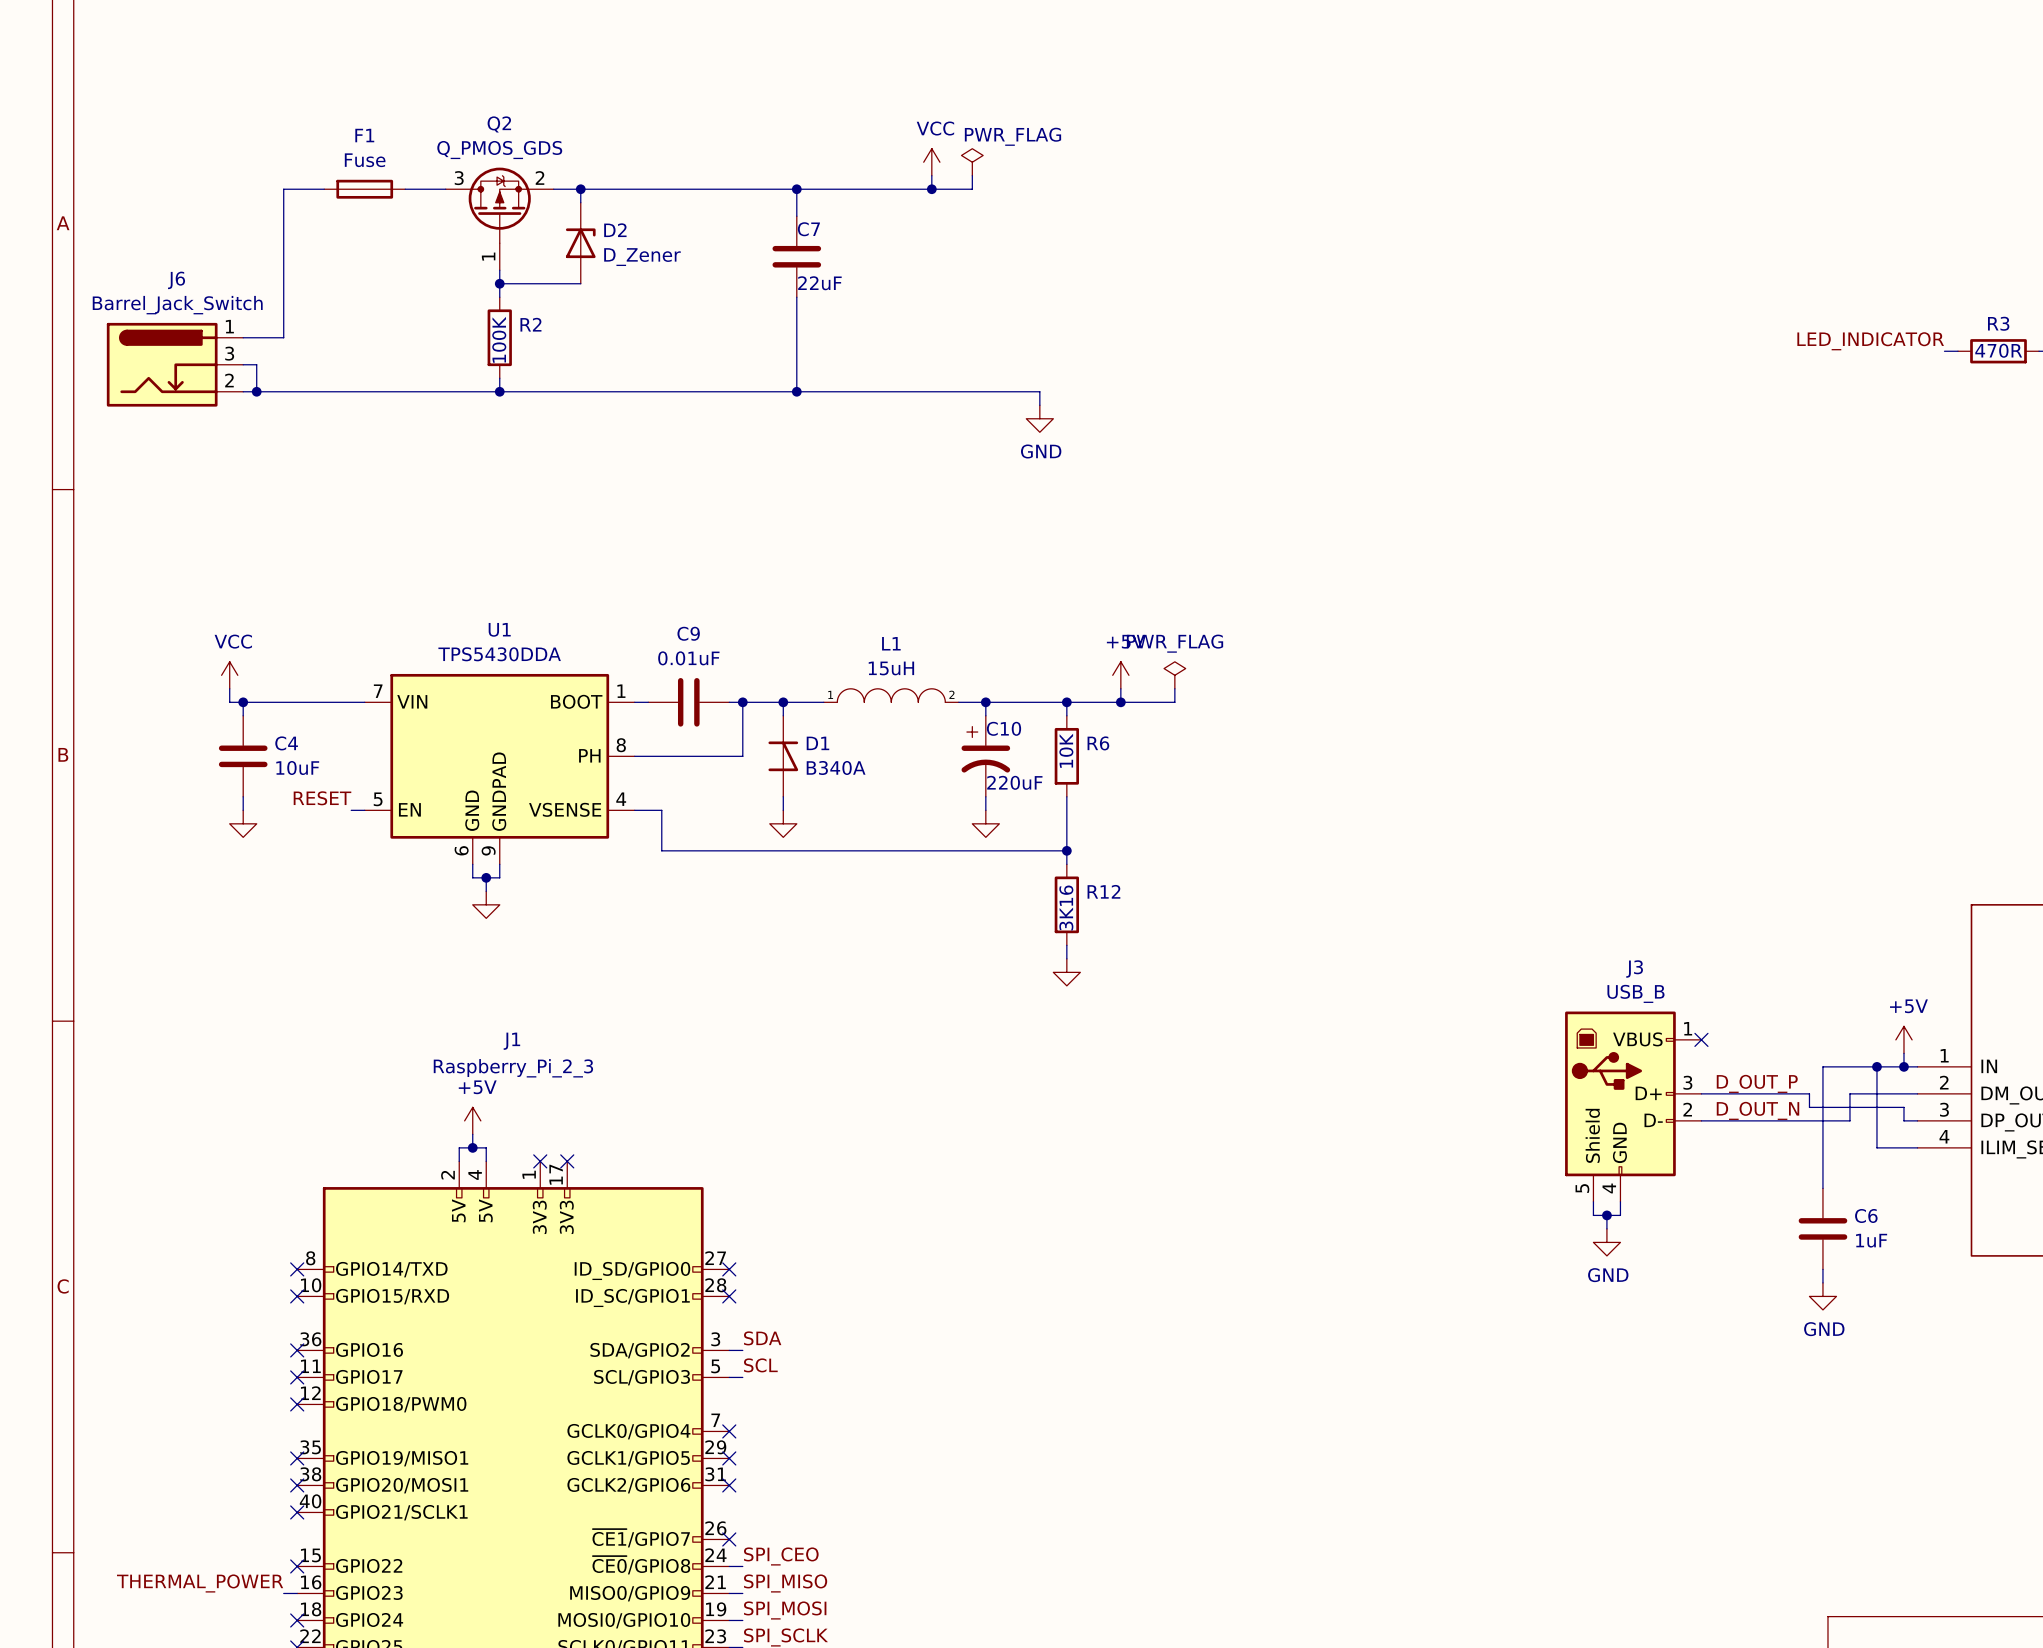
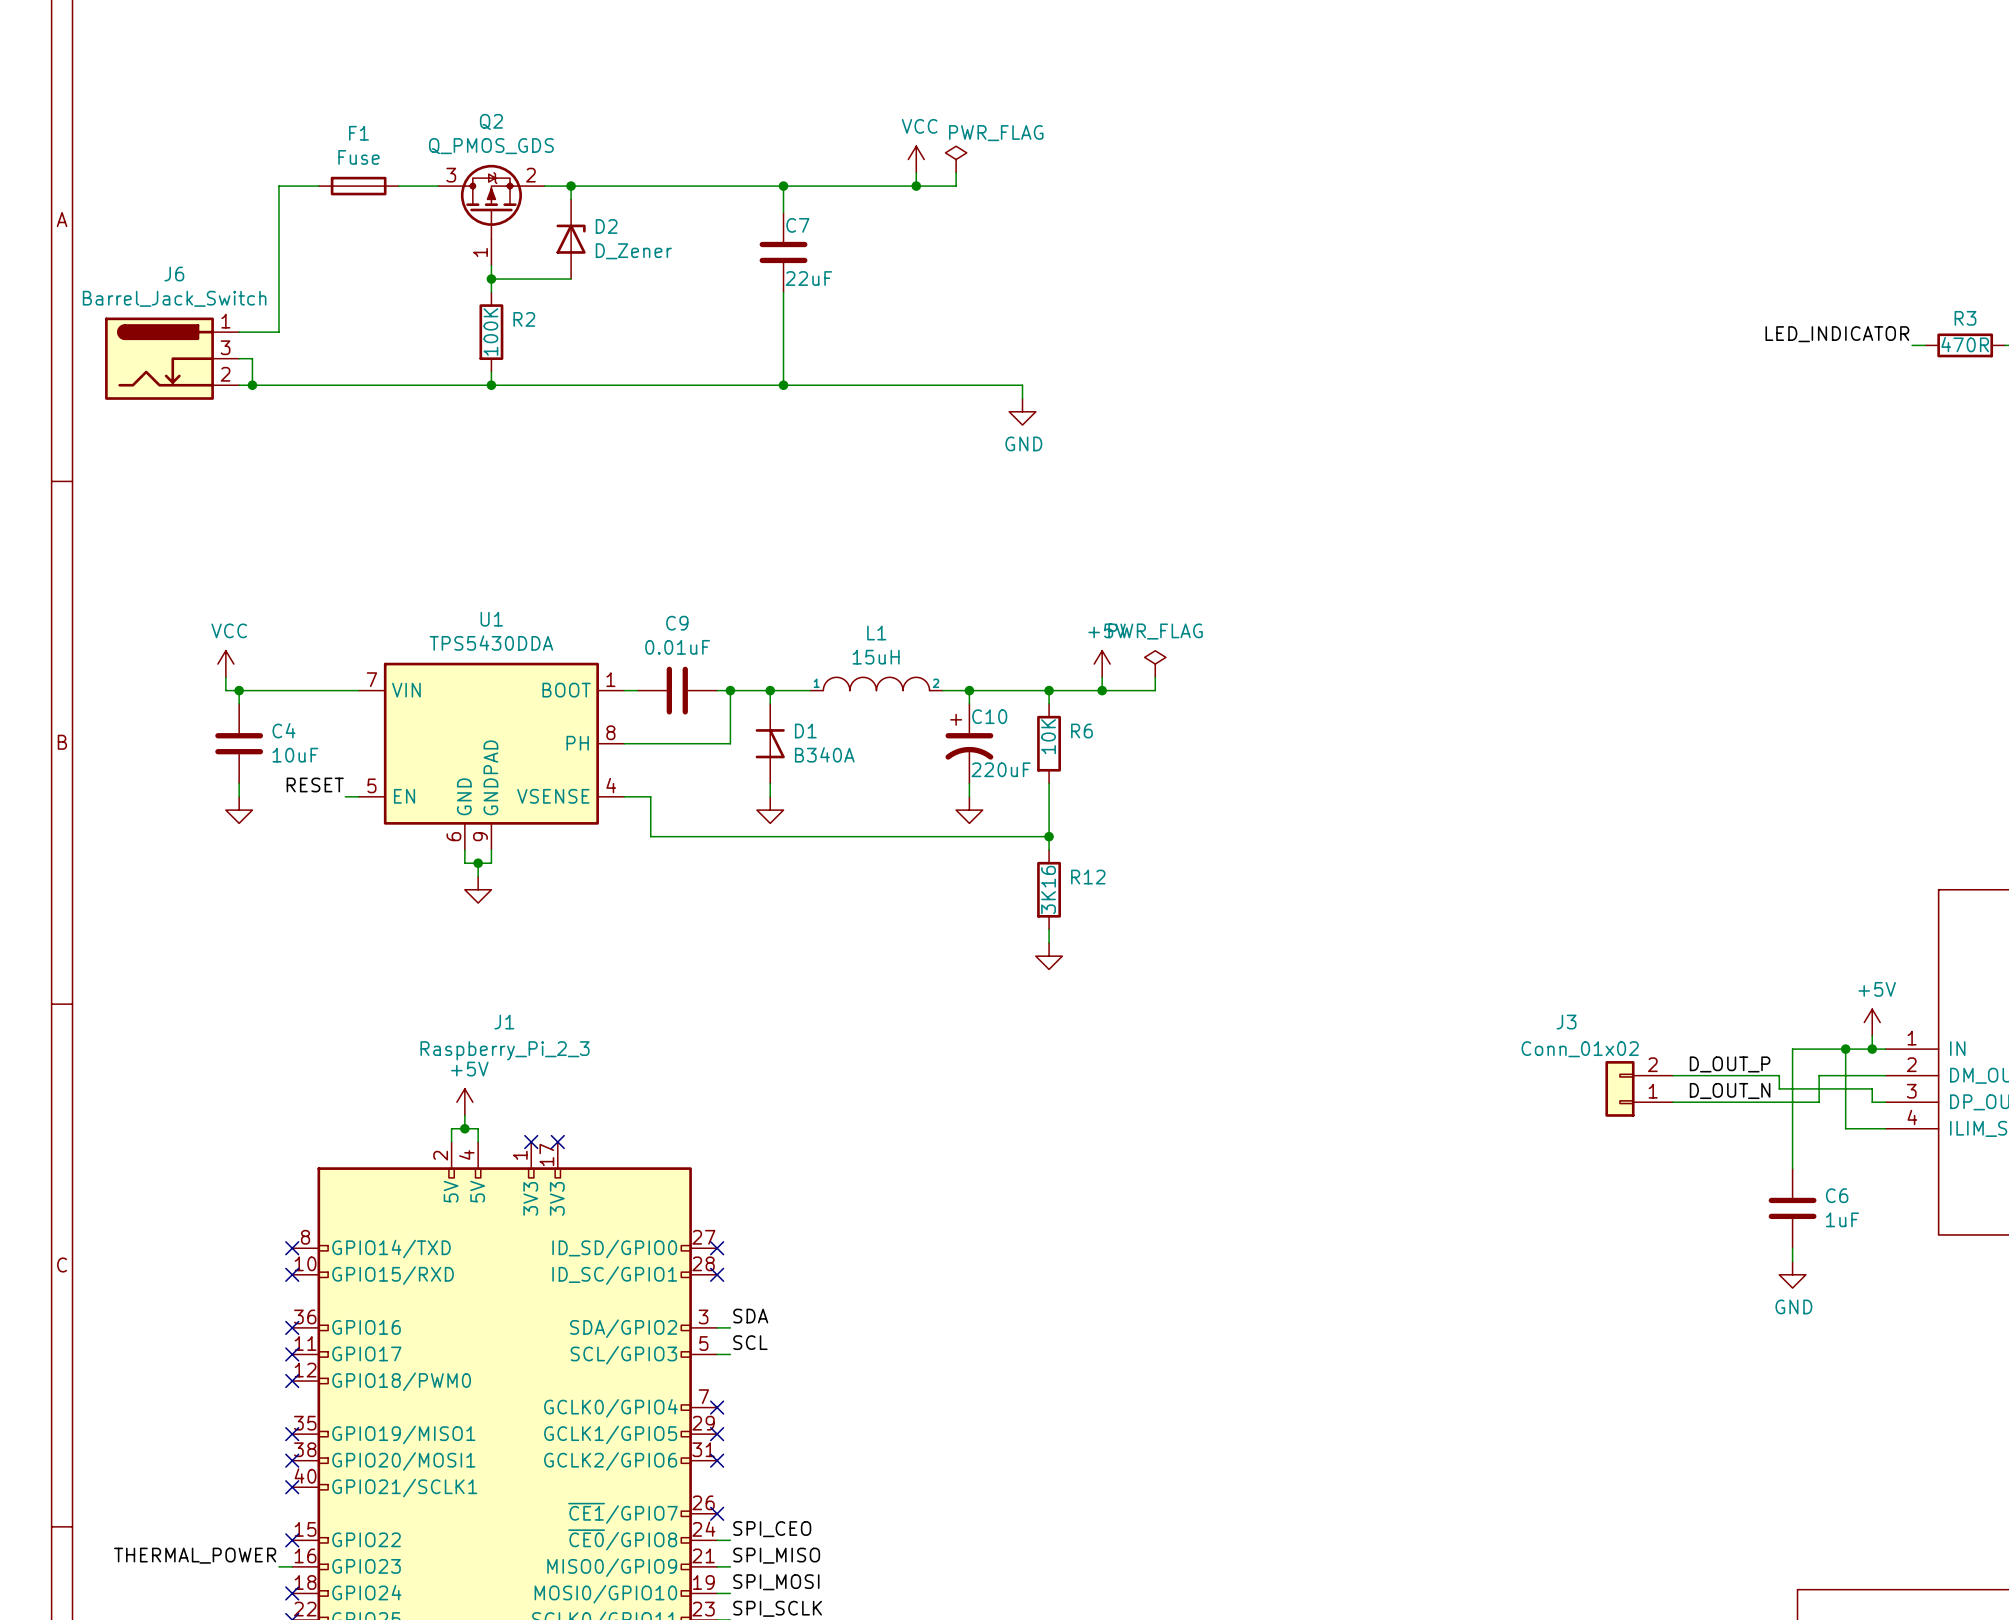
J3 name position: J3 (1634, 969) -> J3 (1566, 1022)
J3 value: USB_B (1635, 993) -> Conn_01x02 (1580, 1049)
J3 symbol: [1565, 1011, 1702, 1202] -> [1605, 1061, 1674, 1117]
no-connect mark: (1701, 1039) -> none
wire: (1593, 1201) (1593, 1215) (1620, 1215) (1620, 1201) -> none
wire: (1606, 1215) (1606, 1228) -> none
junction: (1606, 1215) -> none
power symbol: GND (1606, 1242) -> none

